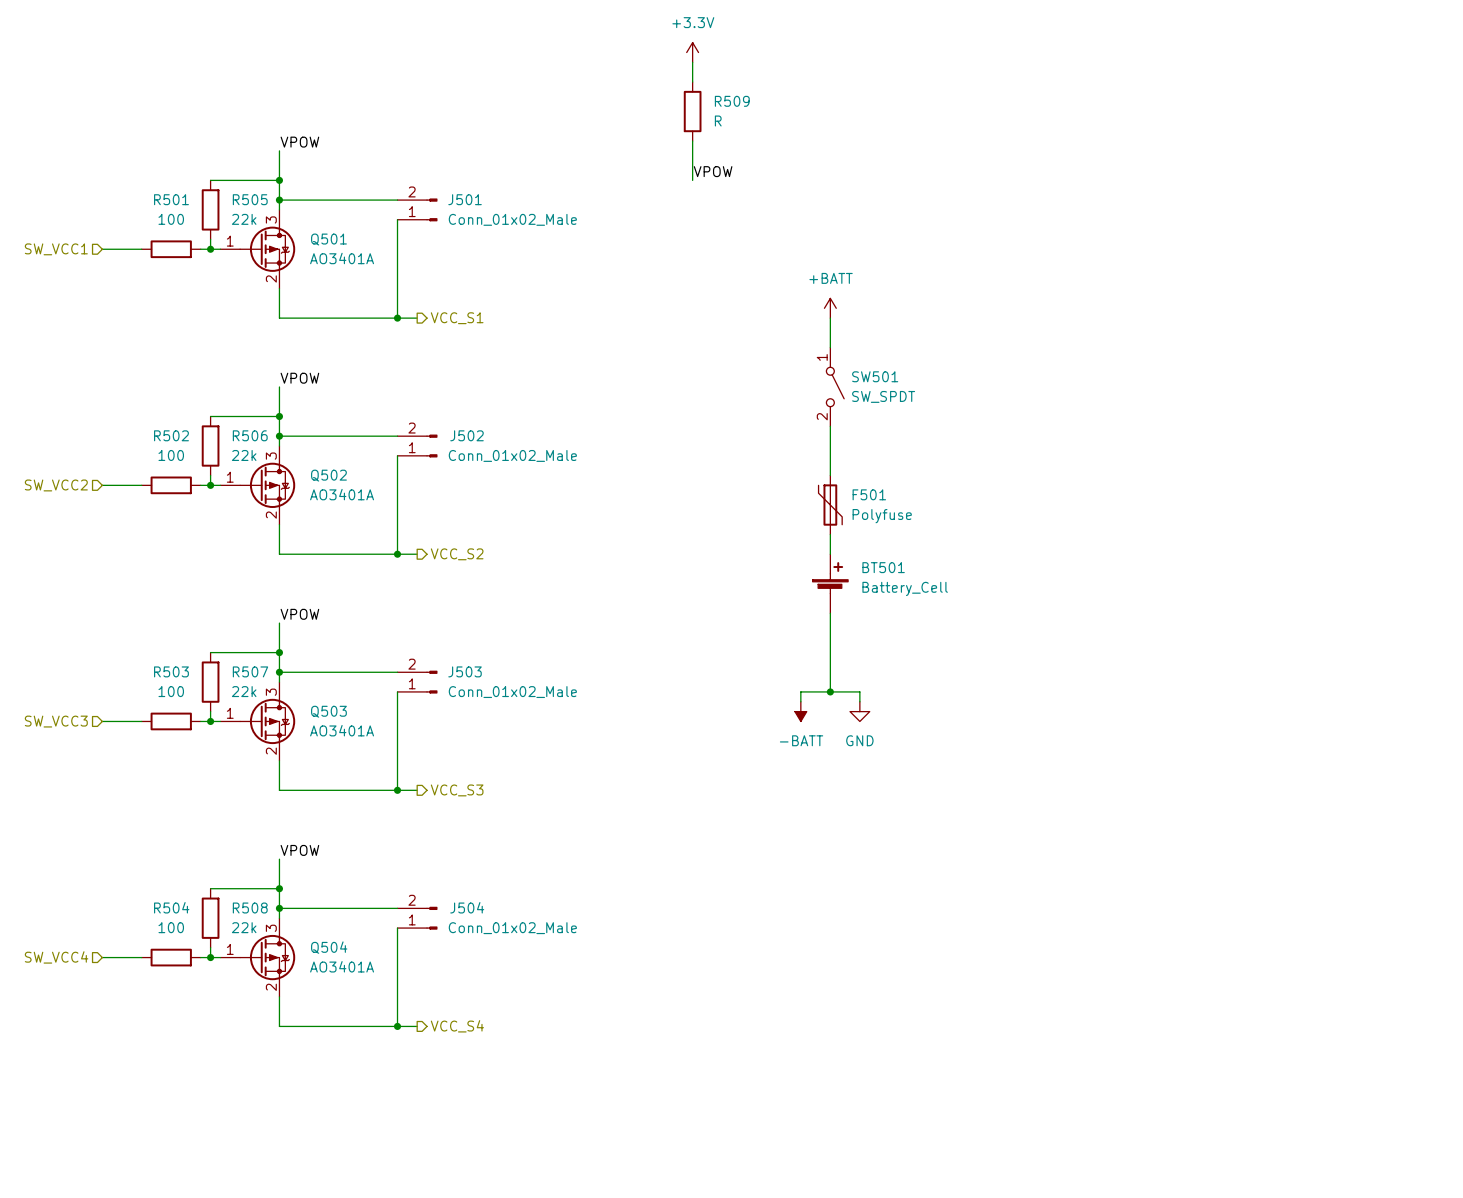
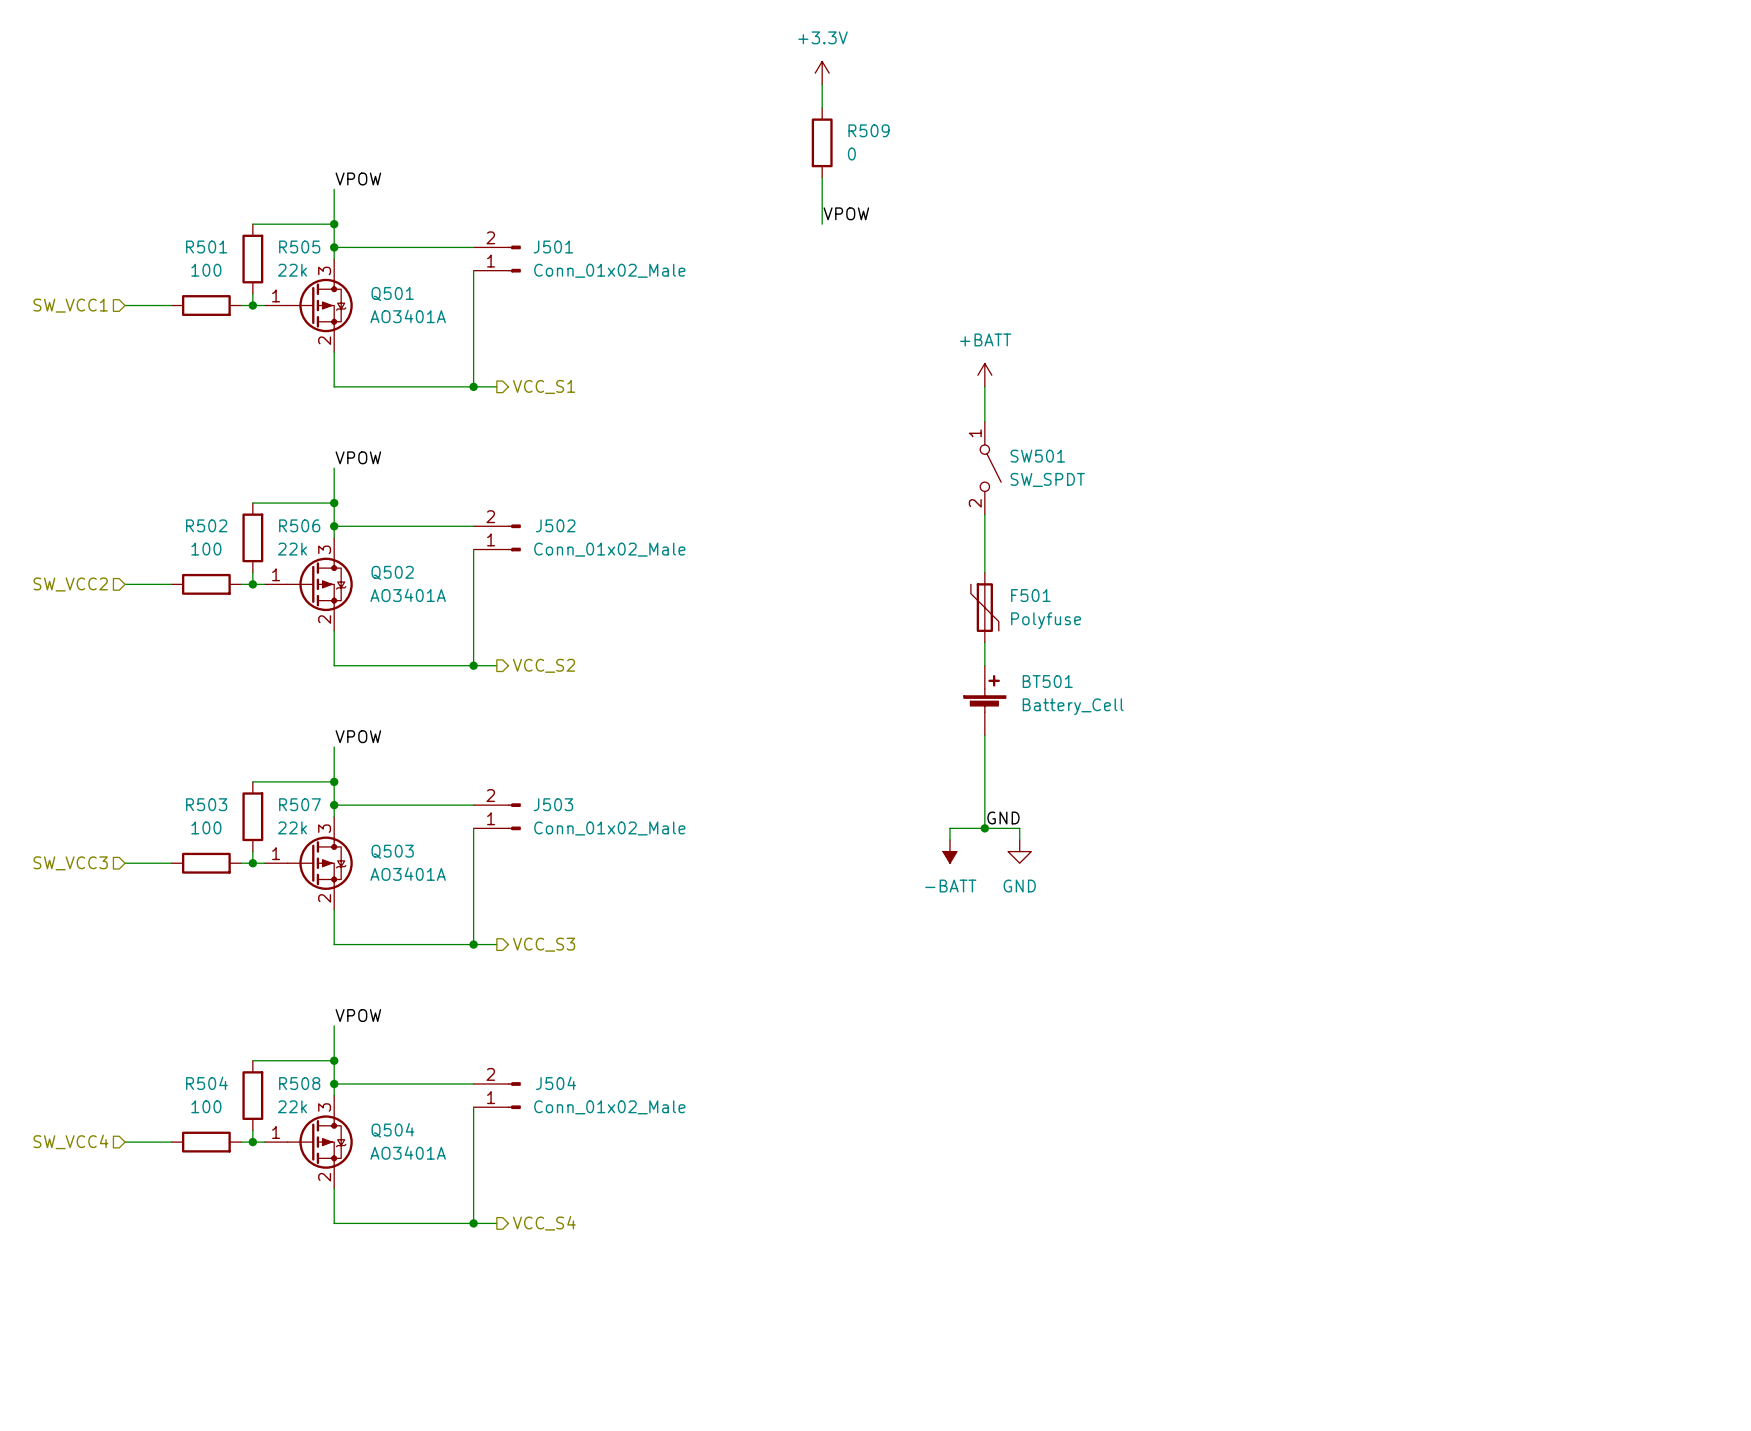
R509 value: R (718, 121) -> 0 (851, 154)
label: none -> GND (1003, 818)

